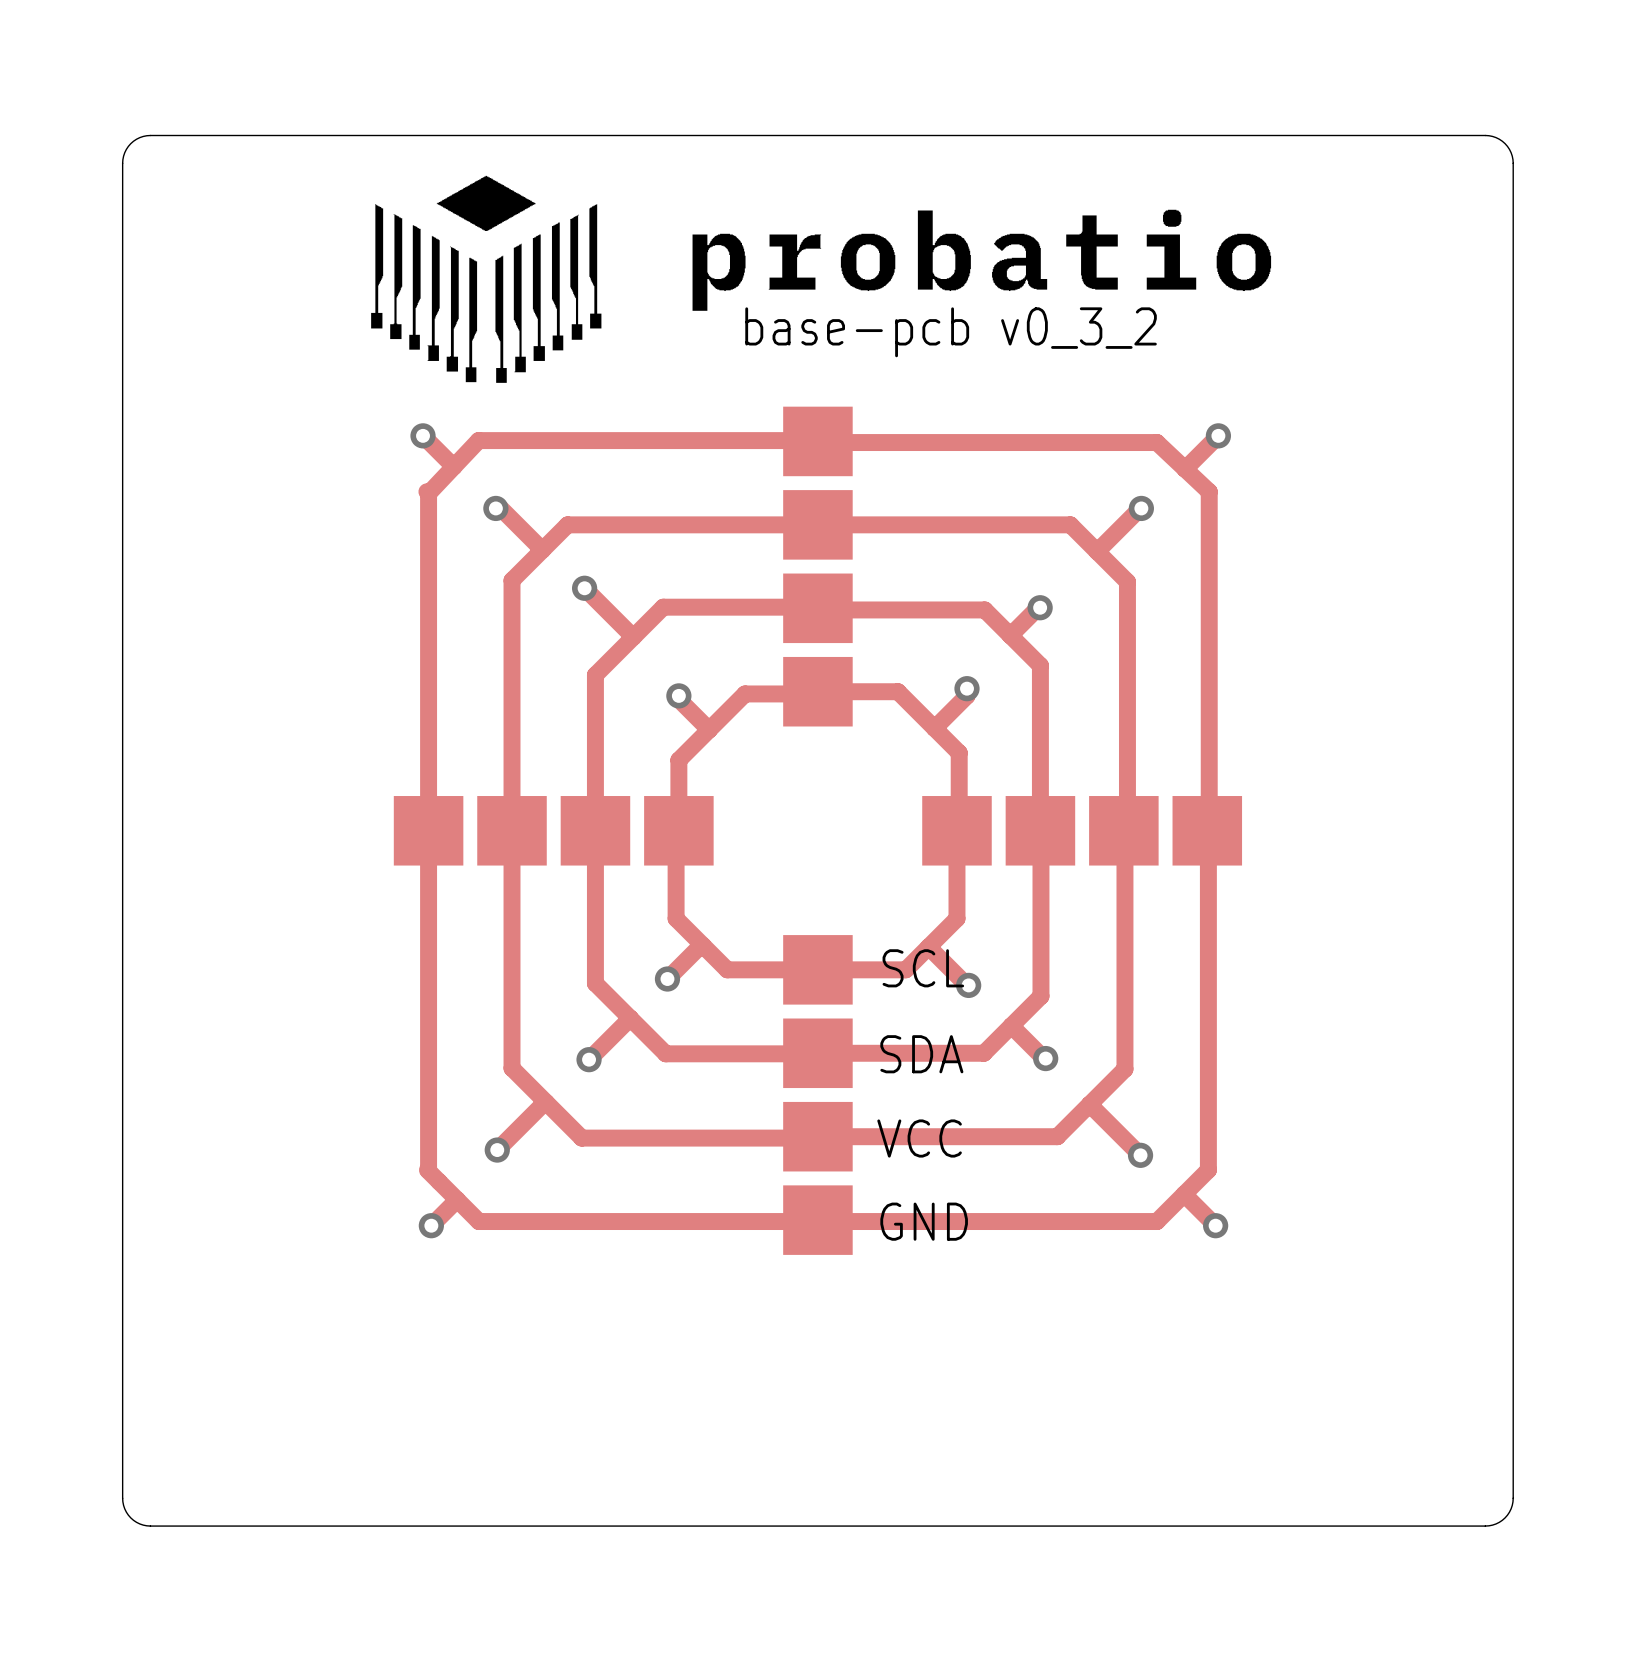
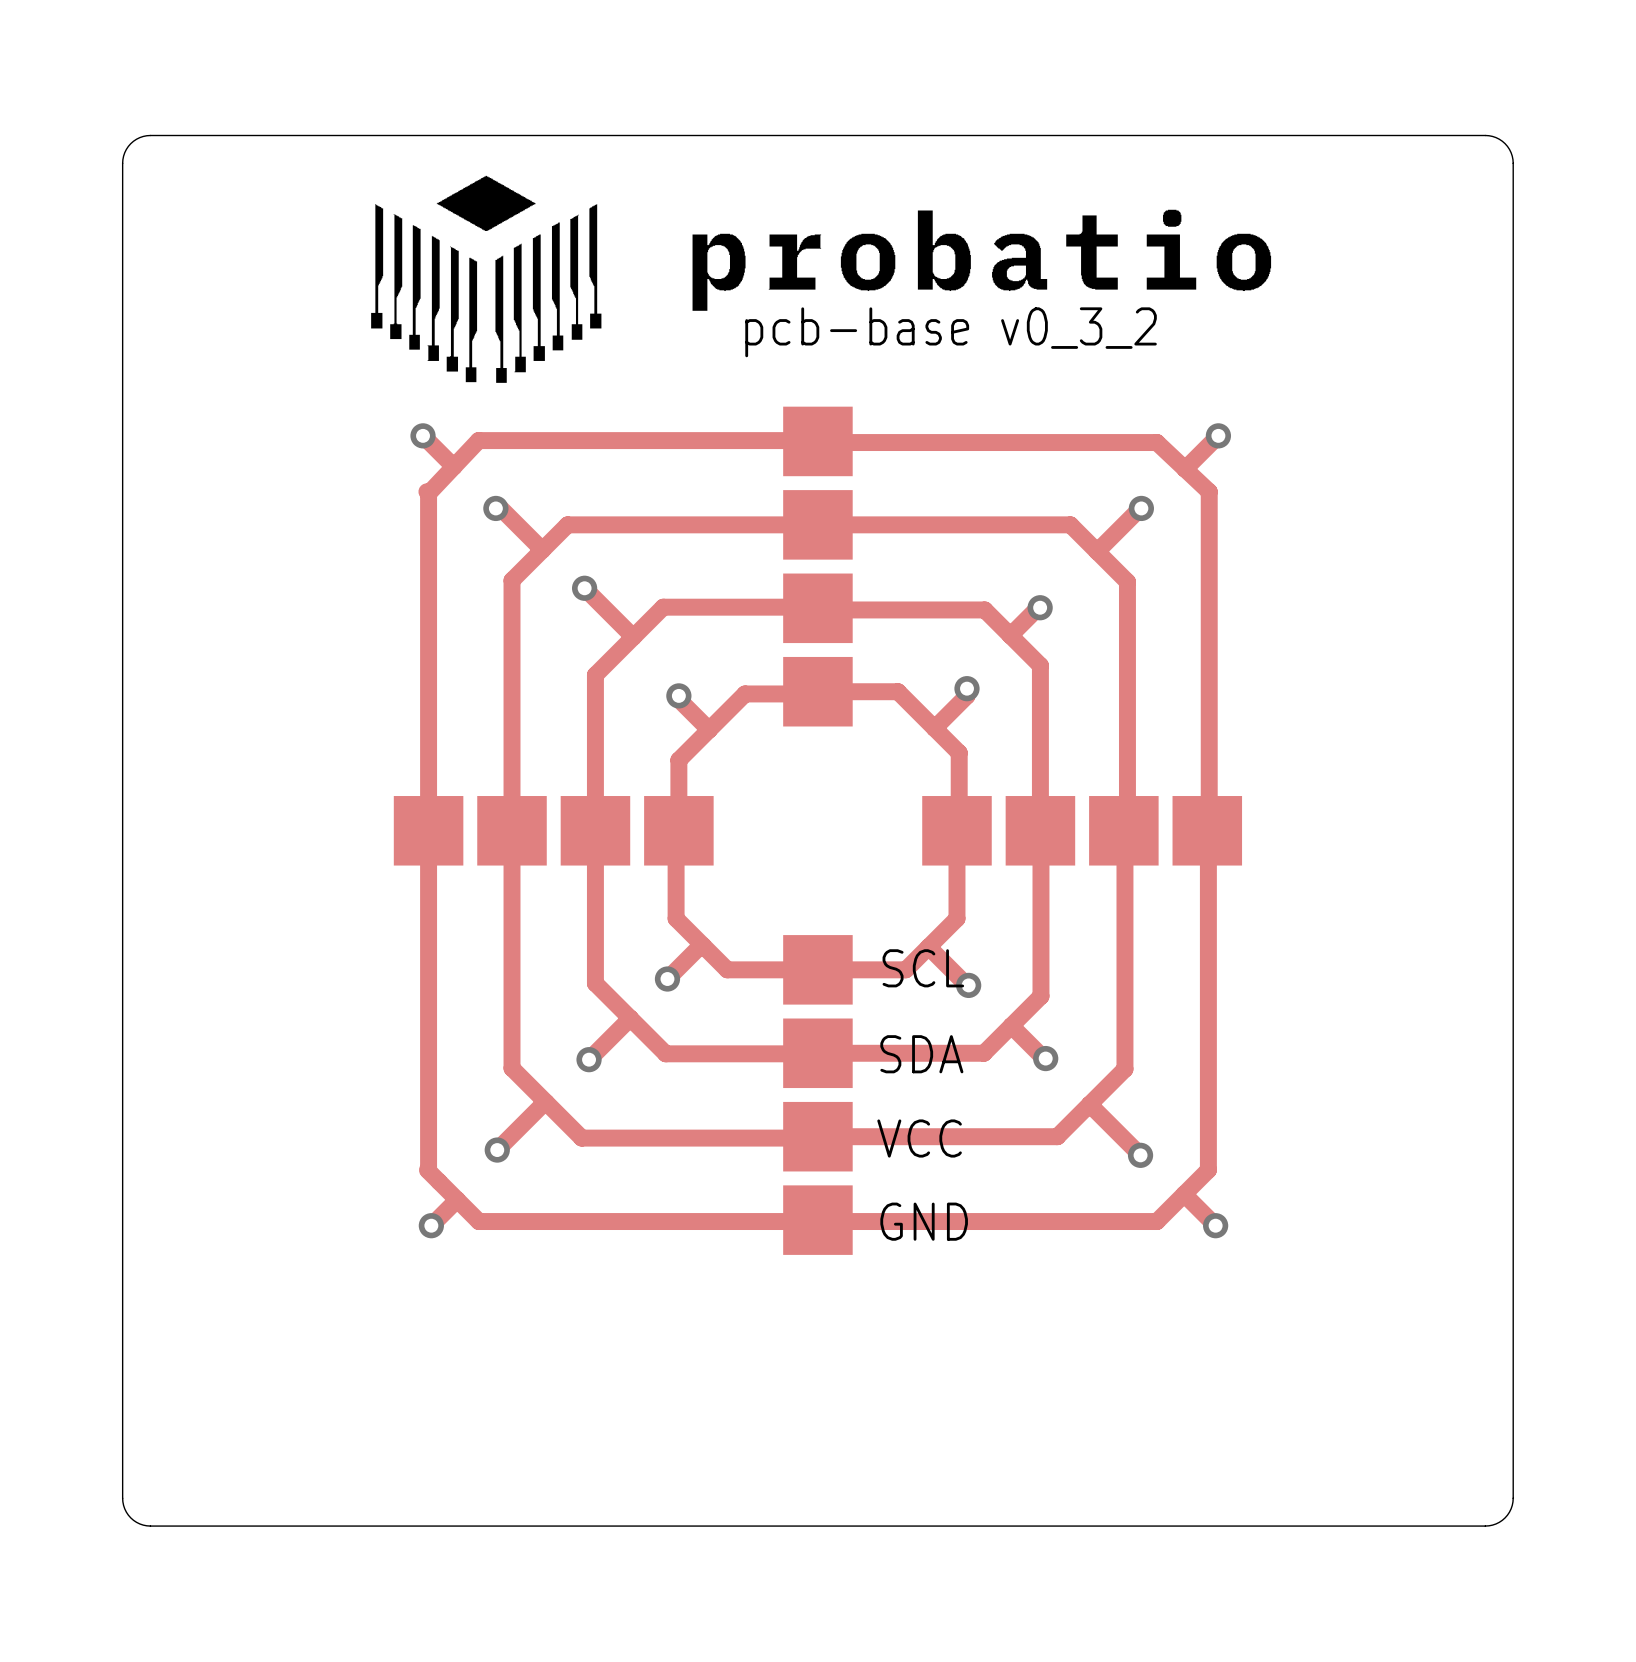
text: base-pcb v0_3_2 (951, 332) -> pcb-base v0_3_2 (951, 332)

